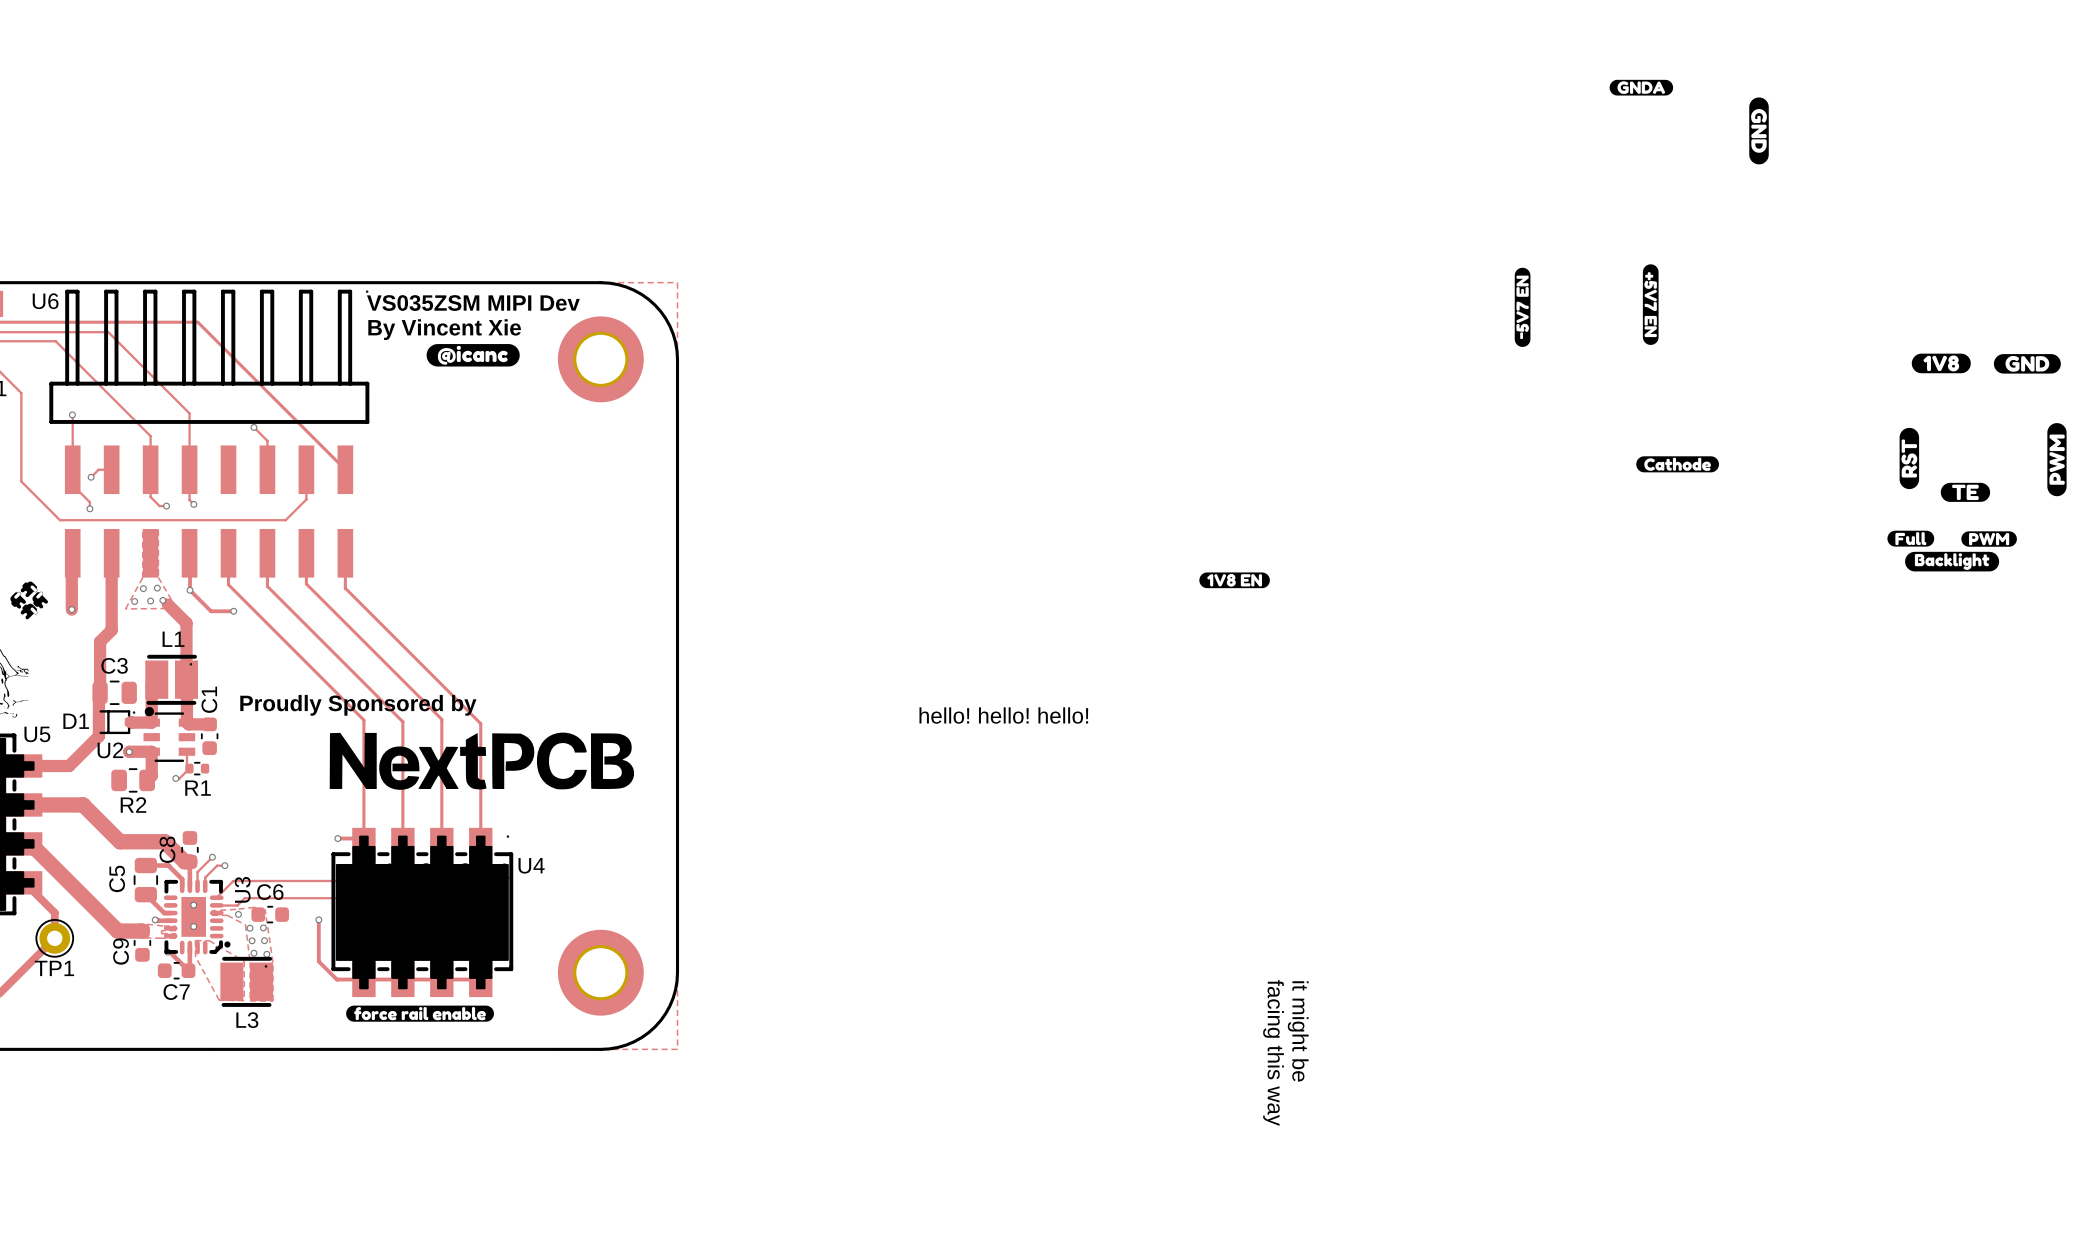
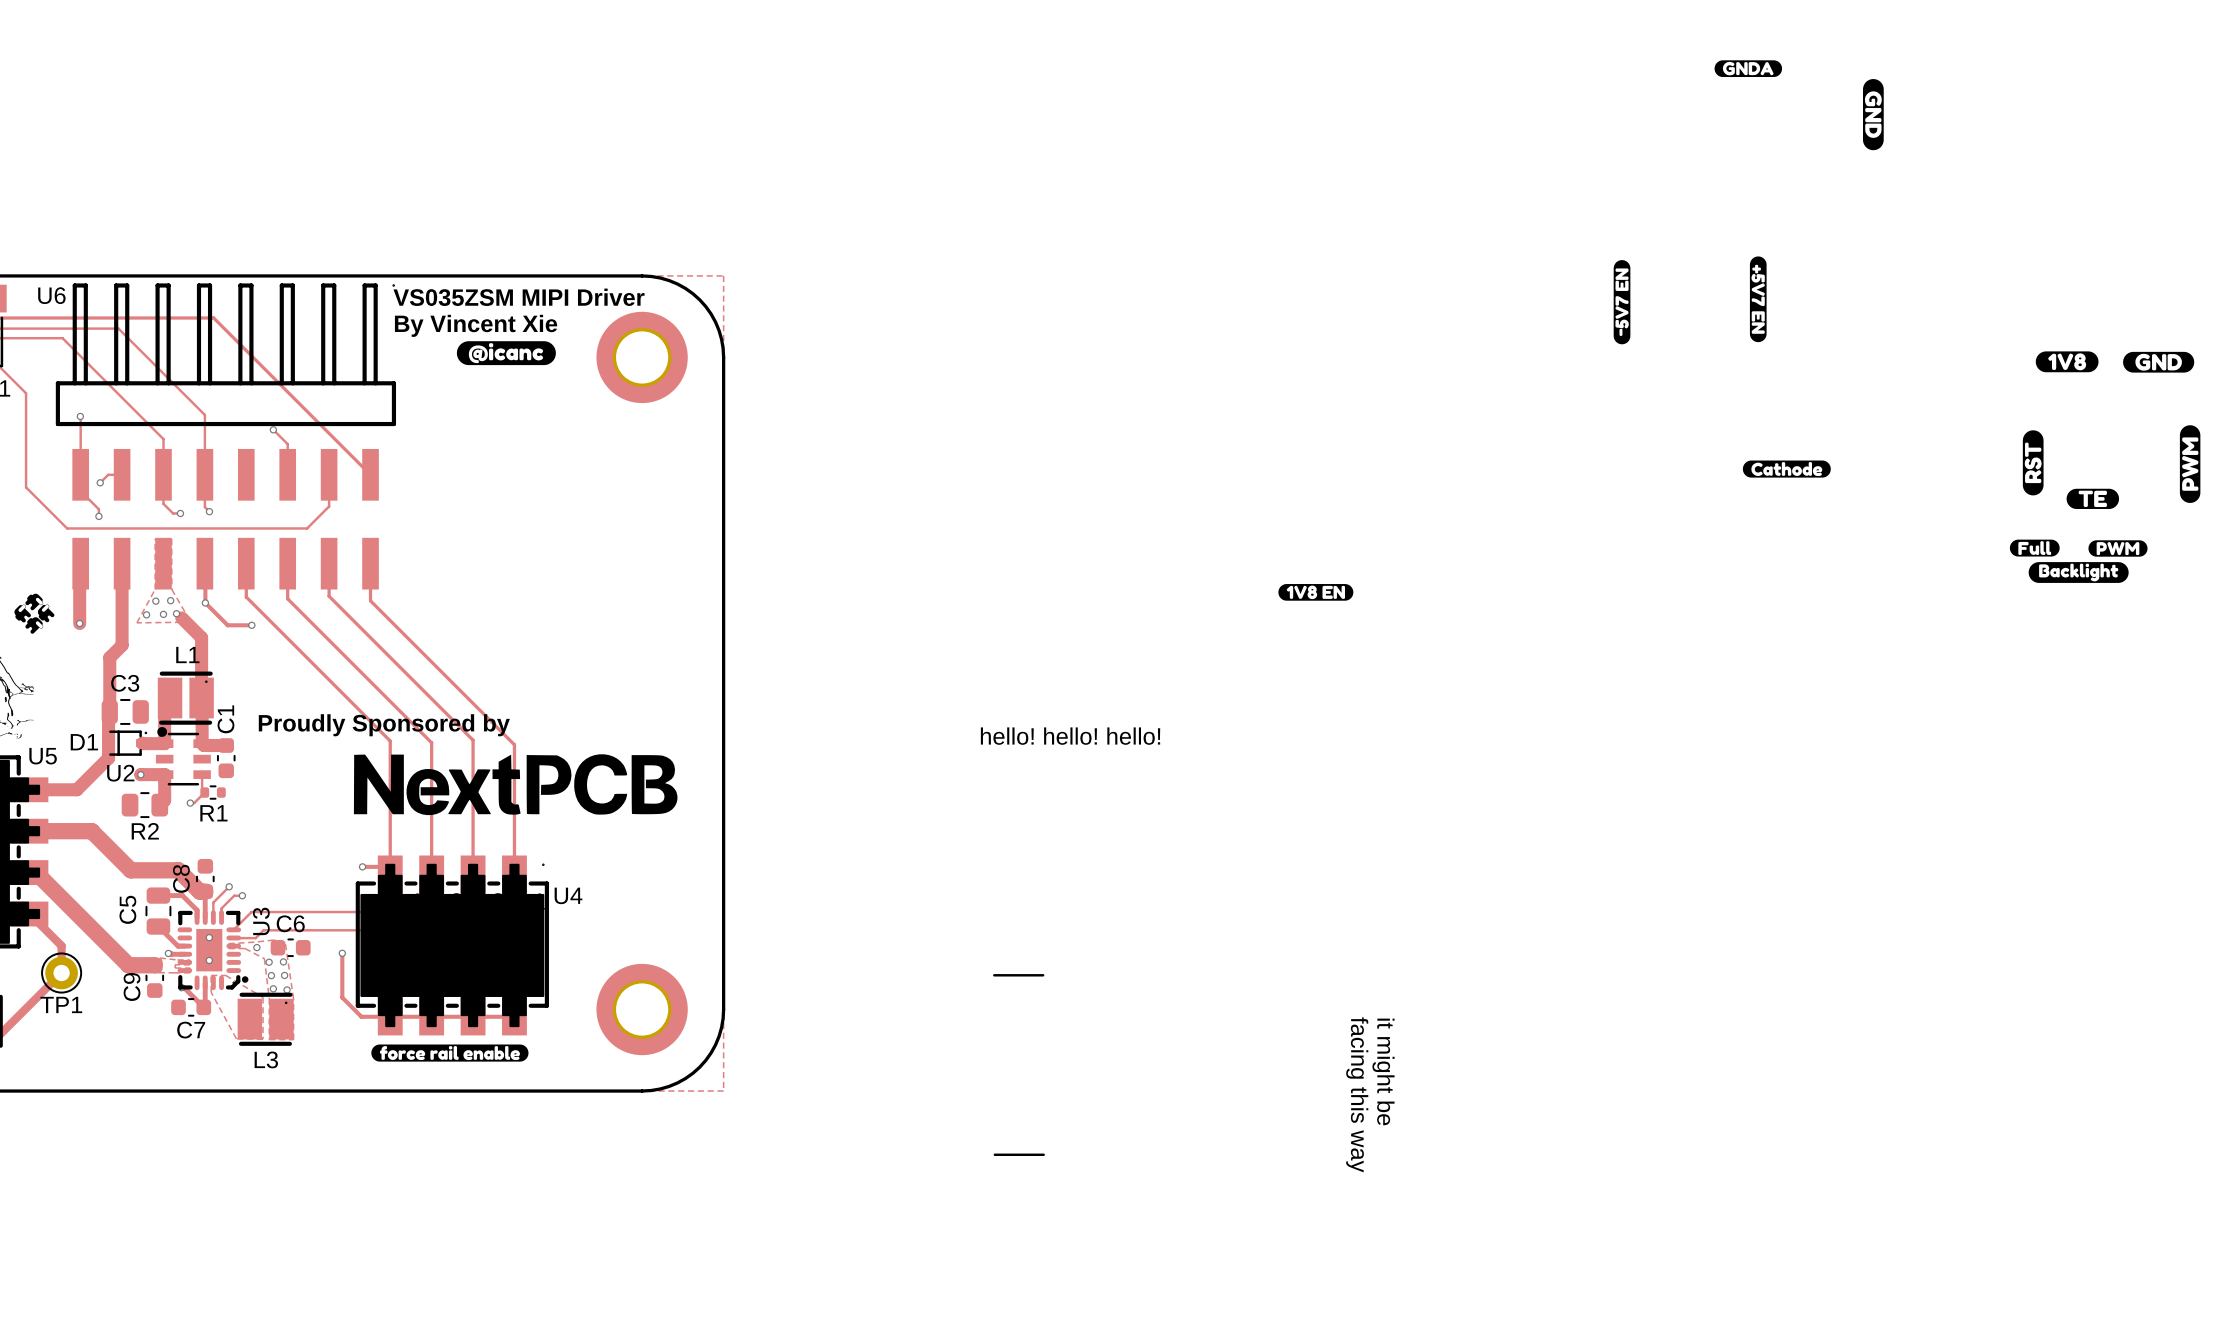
text: VS035ZSM MIPI Dev (473, 303) -> VS035ZSM MIPI Driver (519, 297)
line: none -> (994, 975) (1043, 975)
line: none -> (994, 1154) (1043, 1154)

